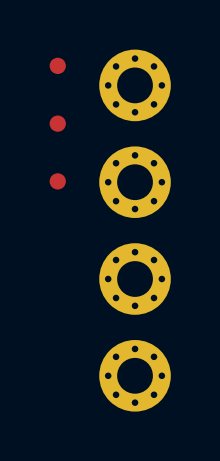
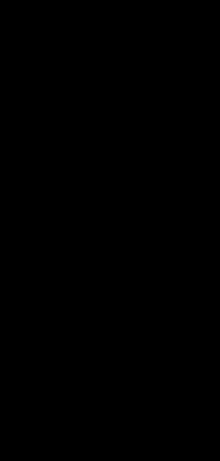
part: (57, 65) -> none
part: (135, 85) -> none
part: (57, 123) -> none
part: (57, 181) -> none
part: (135, 182) -> none
part: (135, 279) -> none
part: (135, 375) -> none

